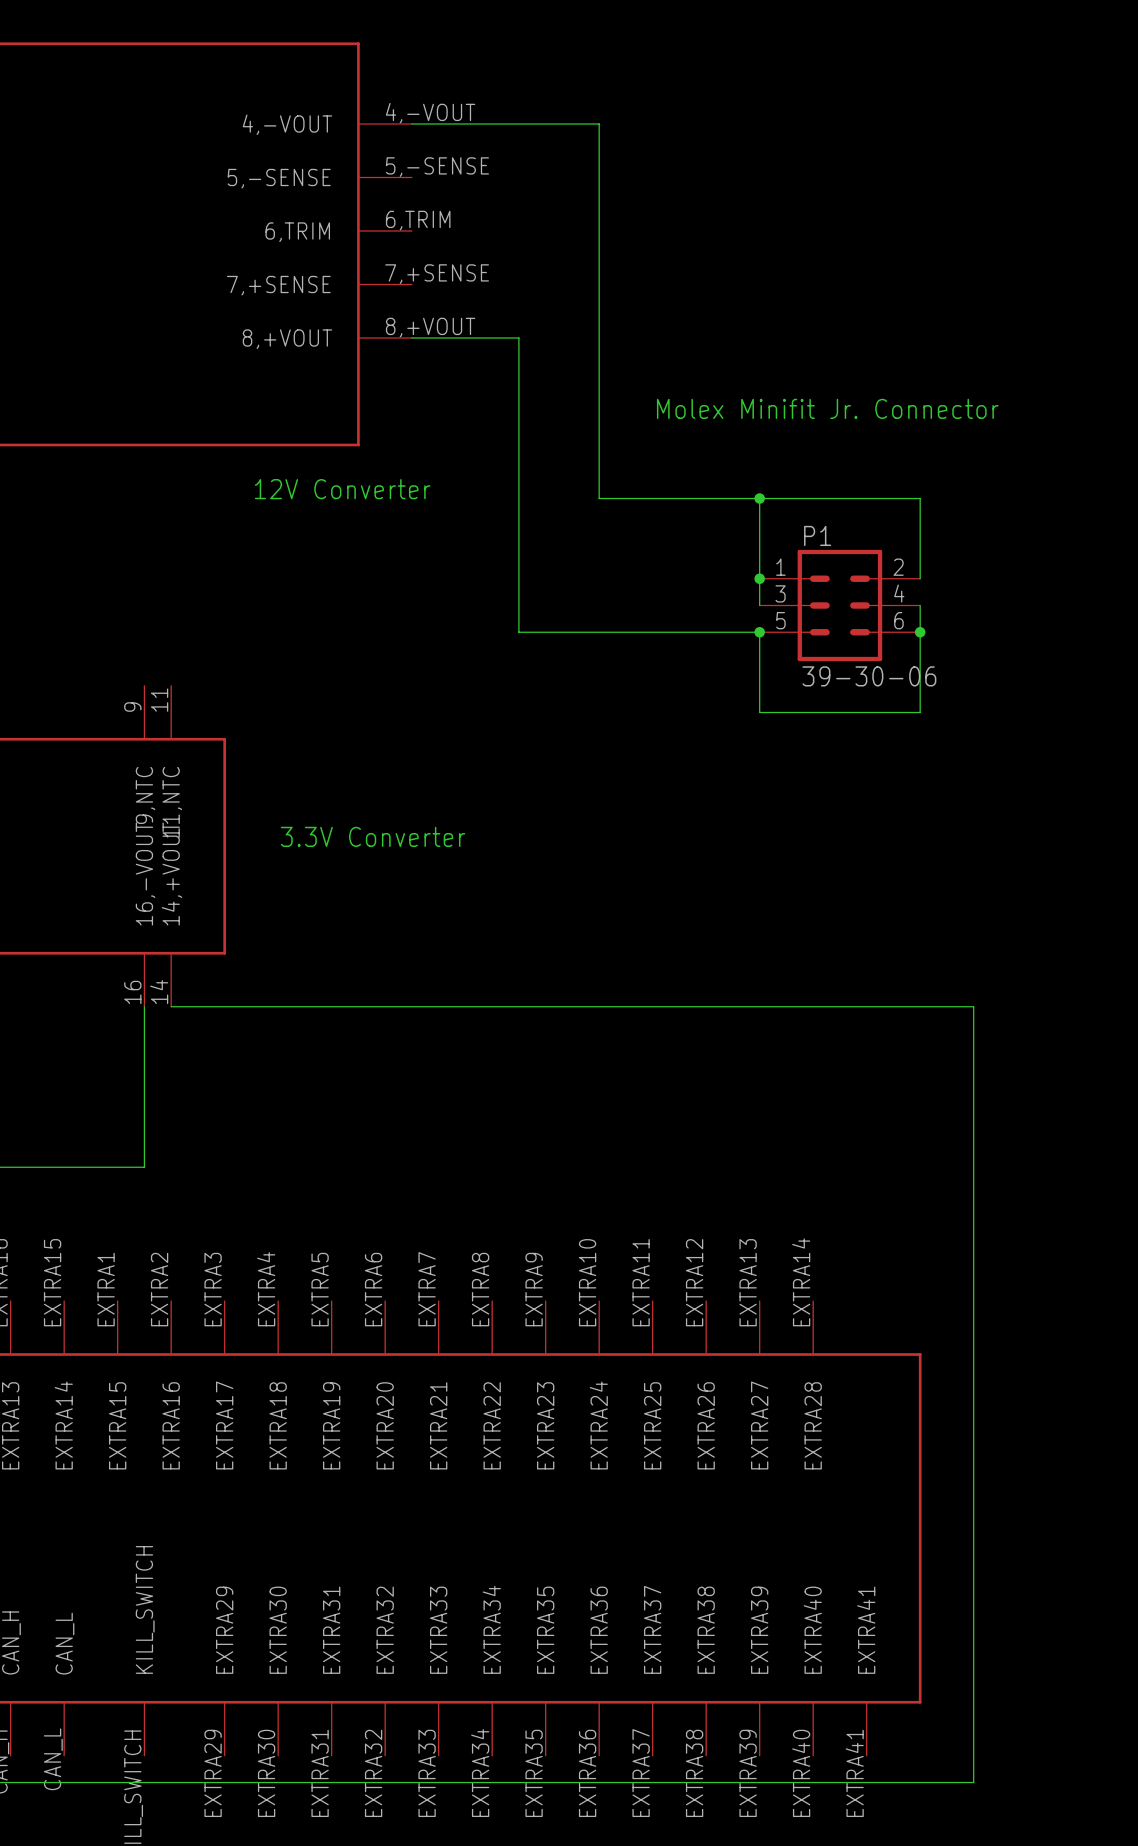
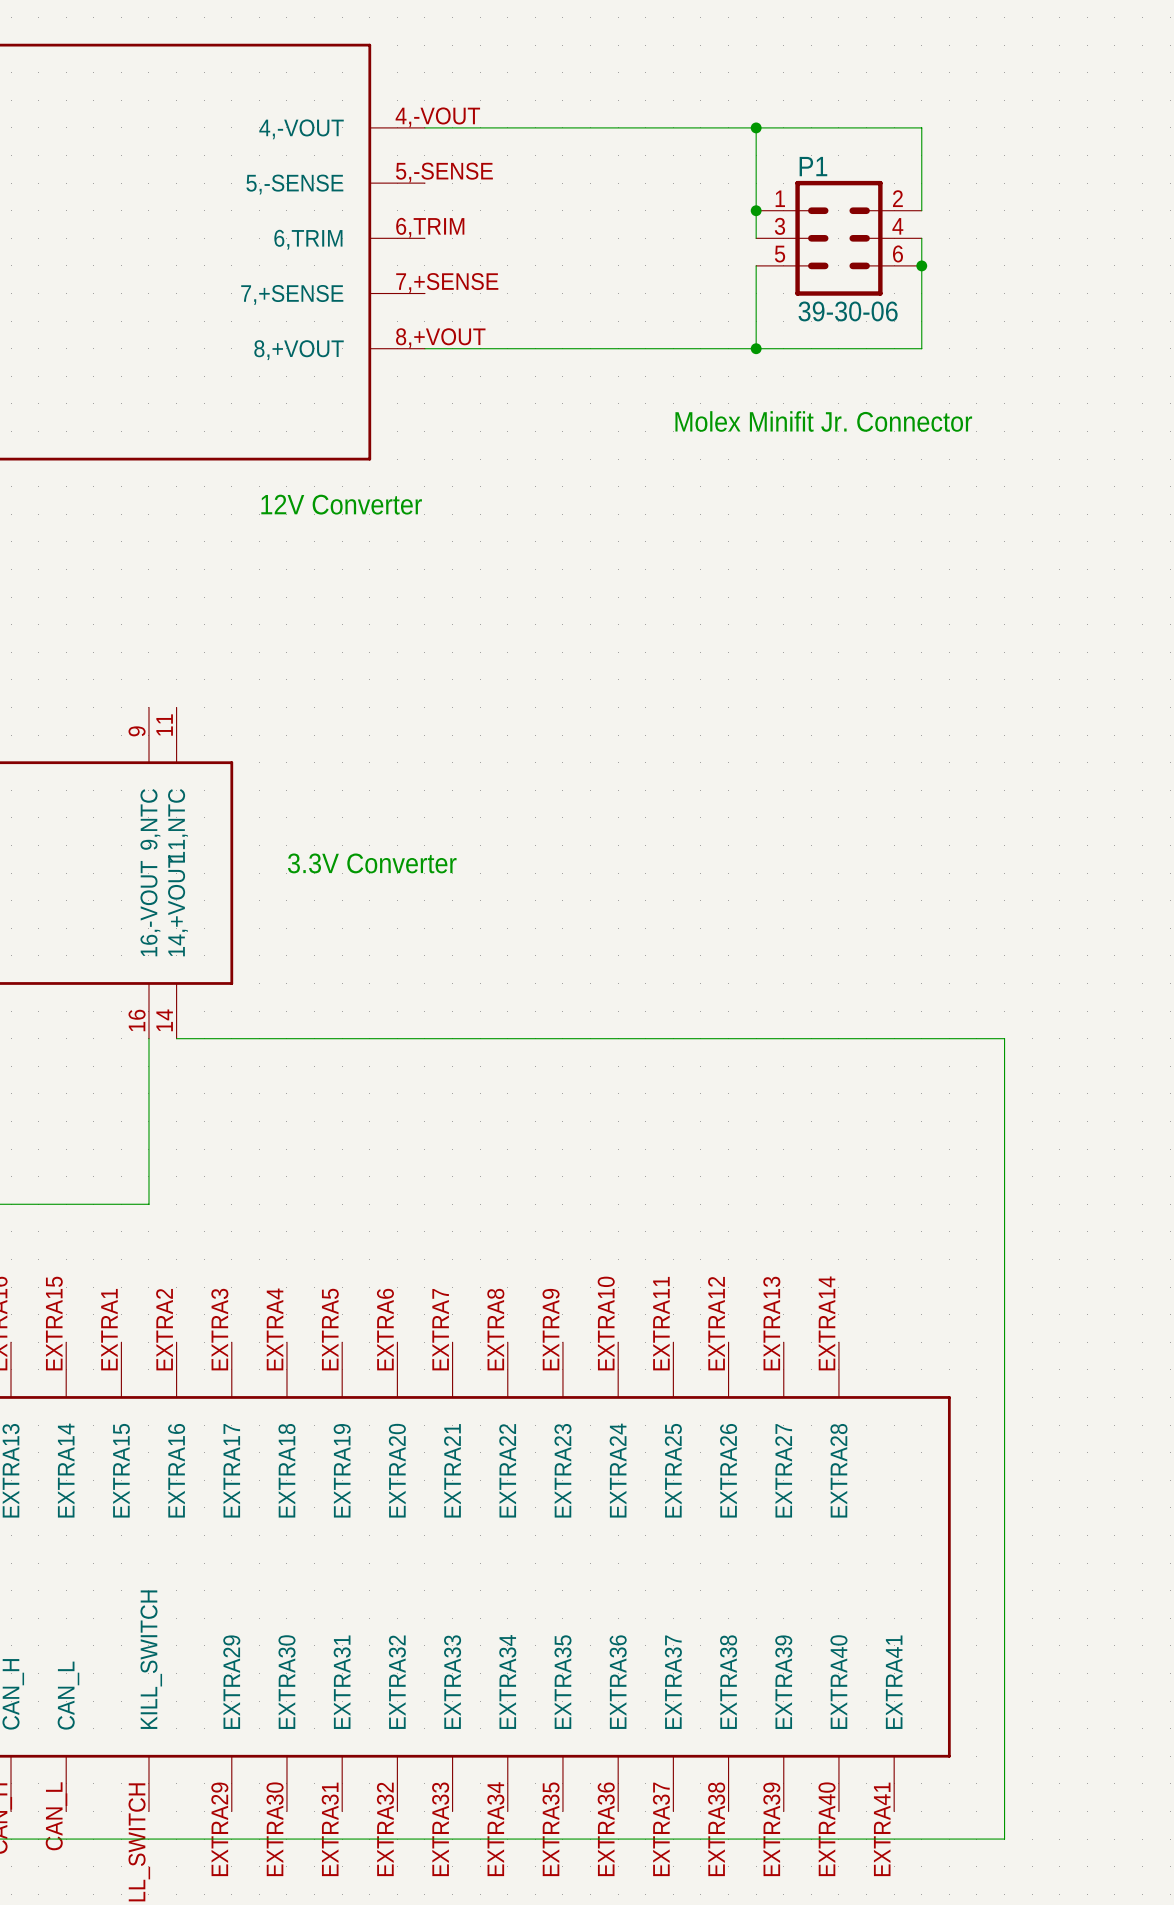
wire: (599, 123) (599, 498) (920, 498) (920, 578) -> (618, 127) (921, 127) (921, 210)
wire: none -> (756, 127) (756, 238)
junction: none -> (756, 127)
junction: none -> (756, 210)
wire: none -> (756, 265) (756, 348)
junction: none -> (921, 265)
wire: (518, 337) (518, 632) (759, 632) (759, 712) (920, 712) (920, 605) -> (535, 348) (921, 348) (921, 238)
junction: none -> (756, 348)
wire: (759, 498) (759, 605) -> none
junction: (759, 498) -> none
junction: (759, 578) -> none
P1 position: (839, 605) -> (838, 238)
junction: (759, 632) -> none
junction: (920, 632) -> none

